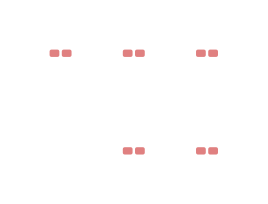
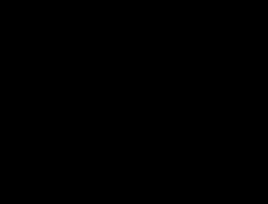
part: (60, 53) -> none
part: (133, 53) -> none
part: (207, 53) -> none
part: (133, 150) -> none
part: (207, 150) -> none

